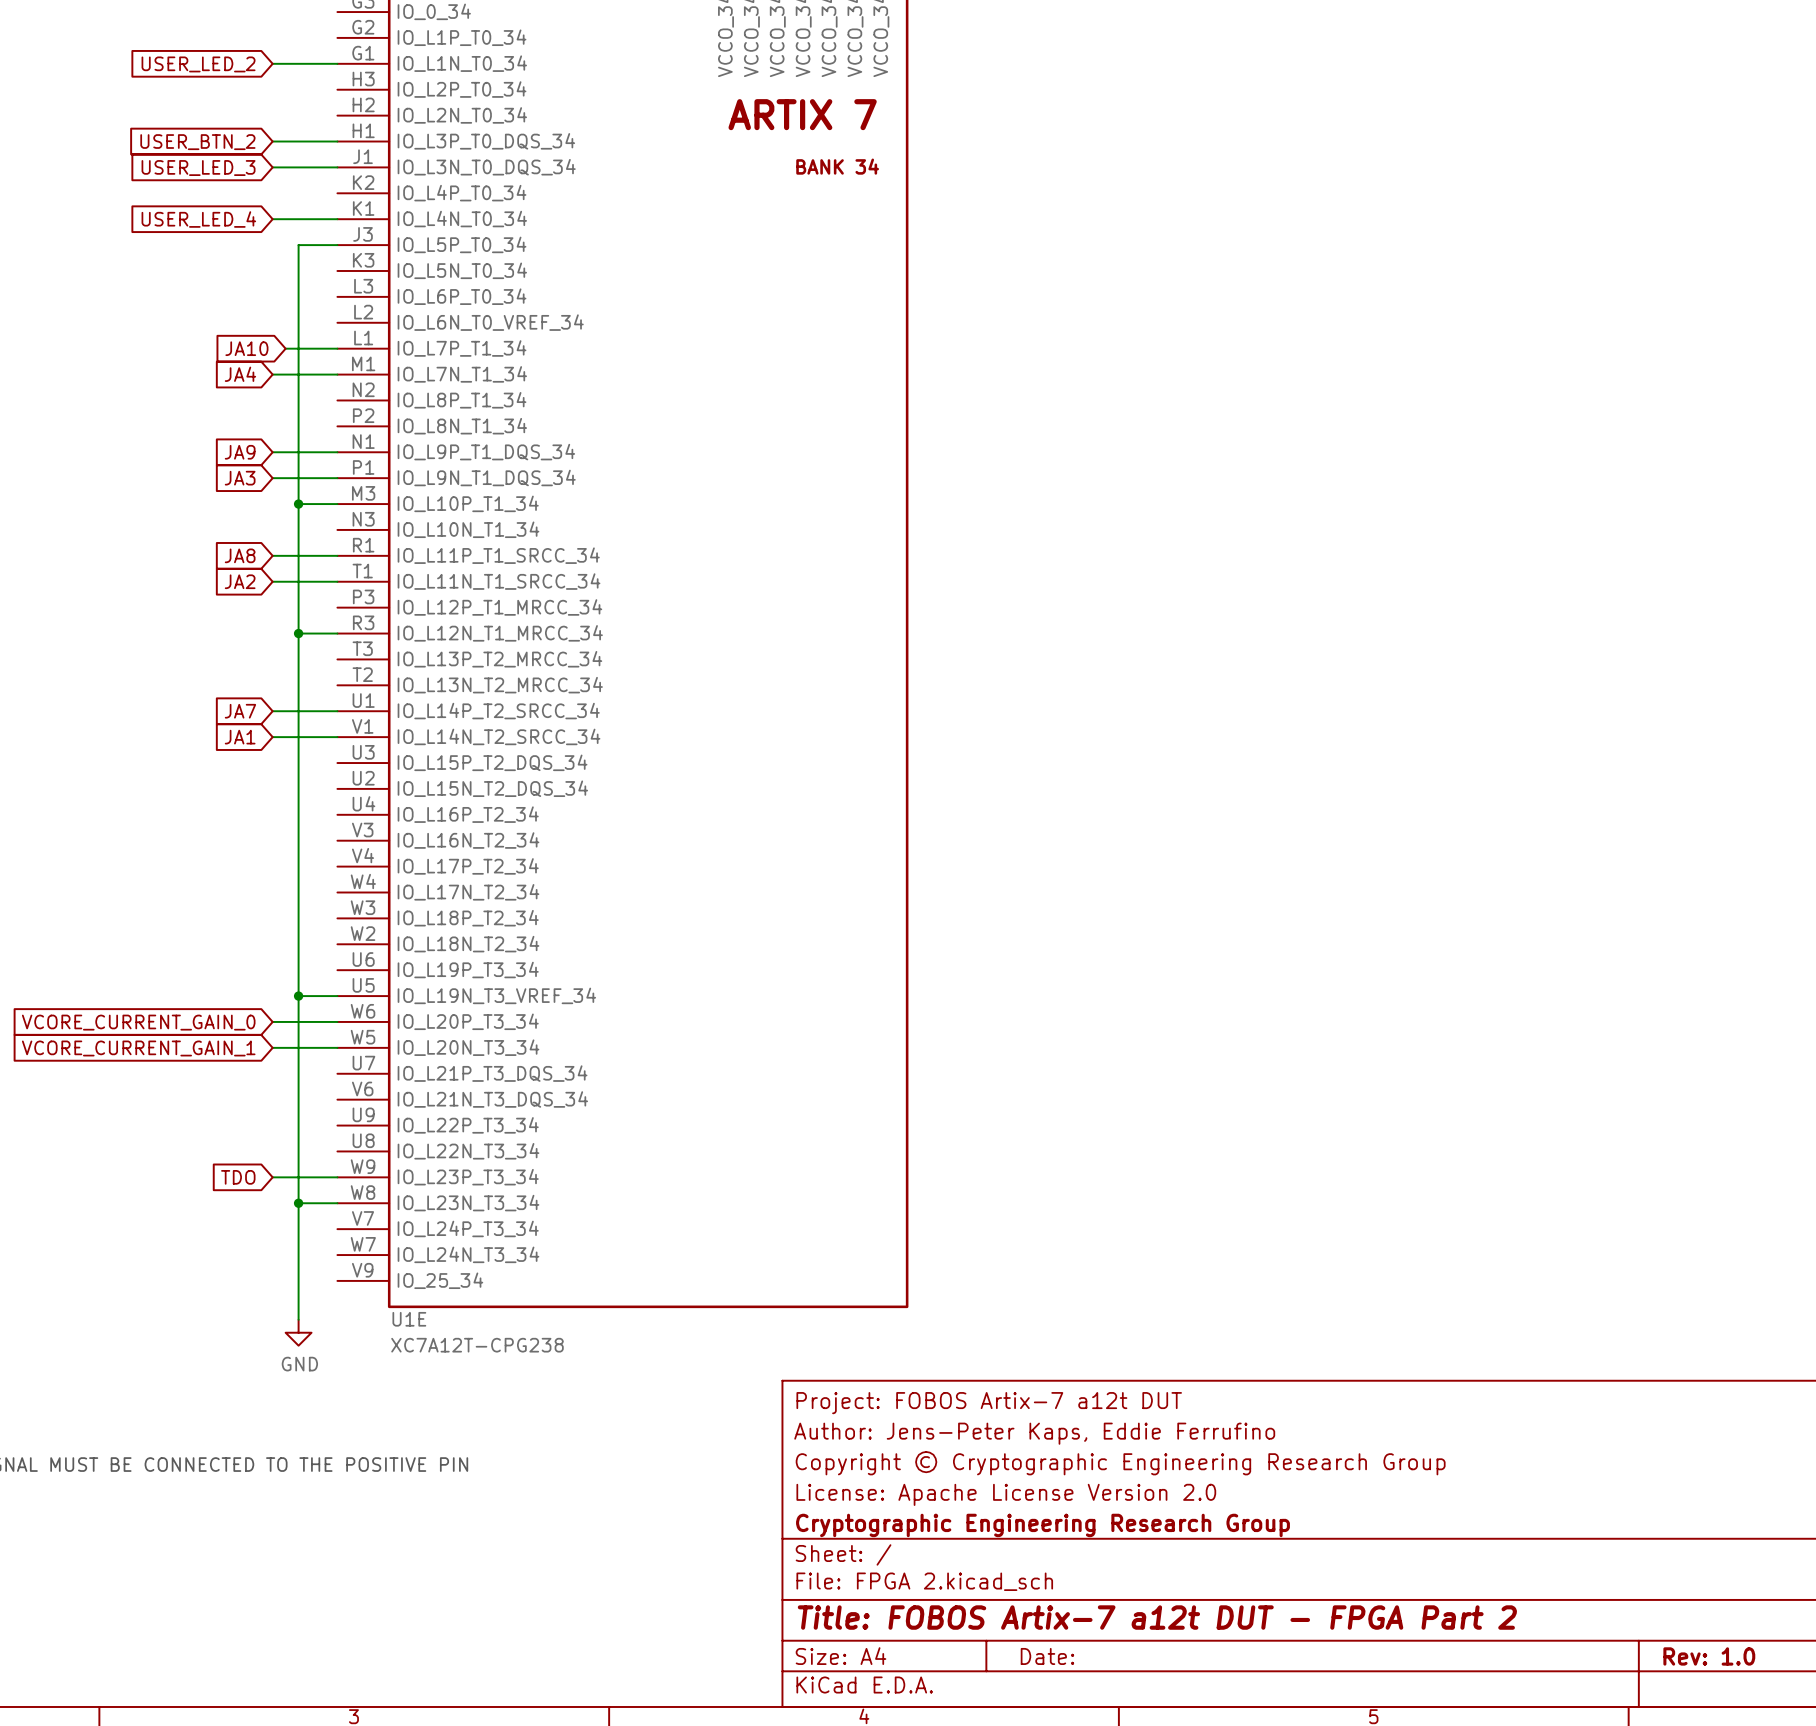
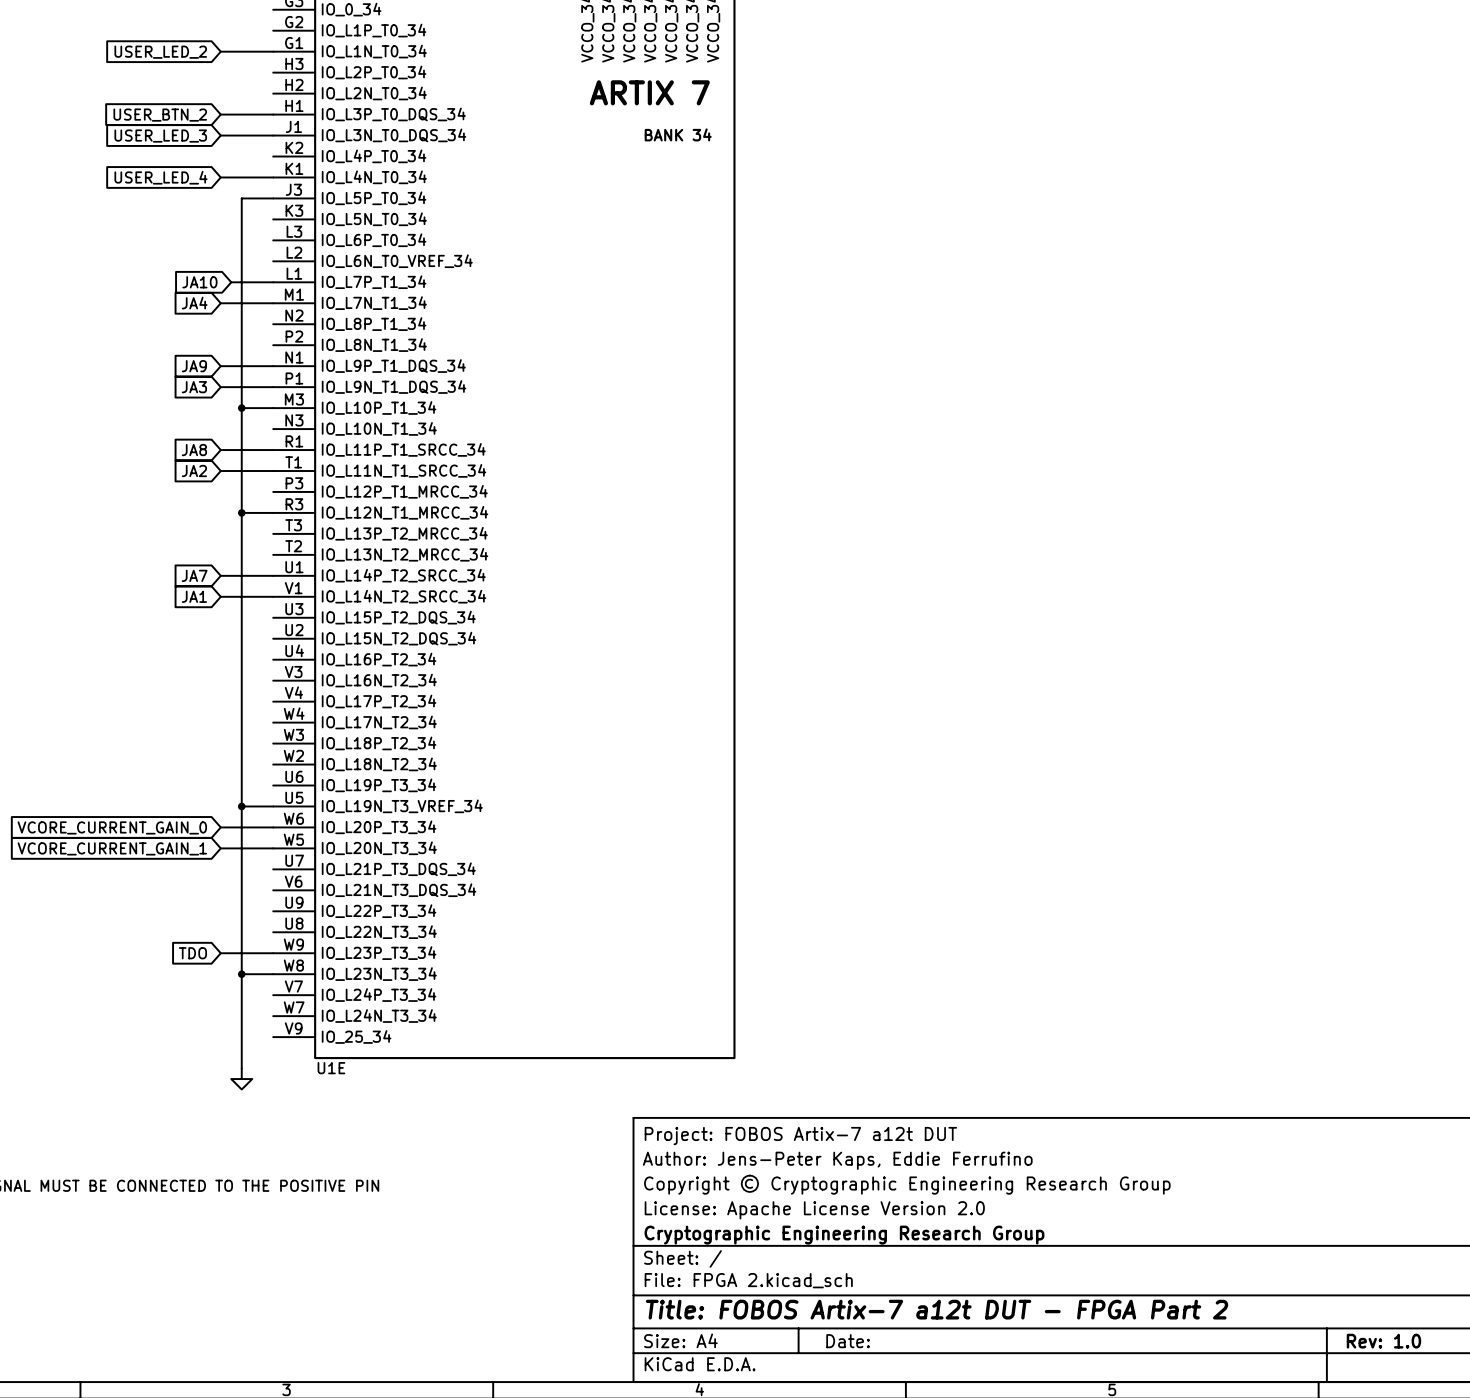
U1E value: XC7A12T-CPG238 (477, 1345) -> none
power symbol text: GND (299, 1364) -> none

